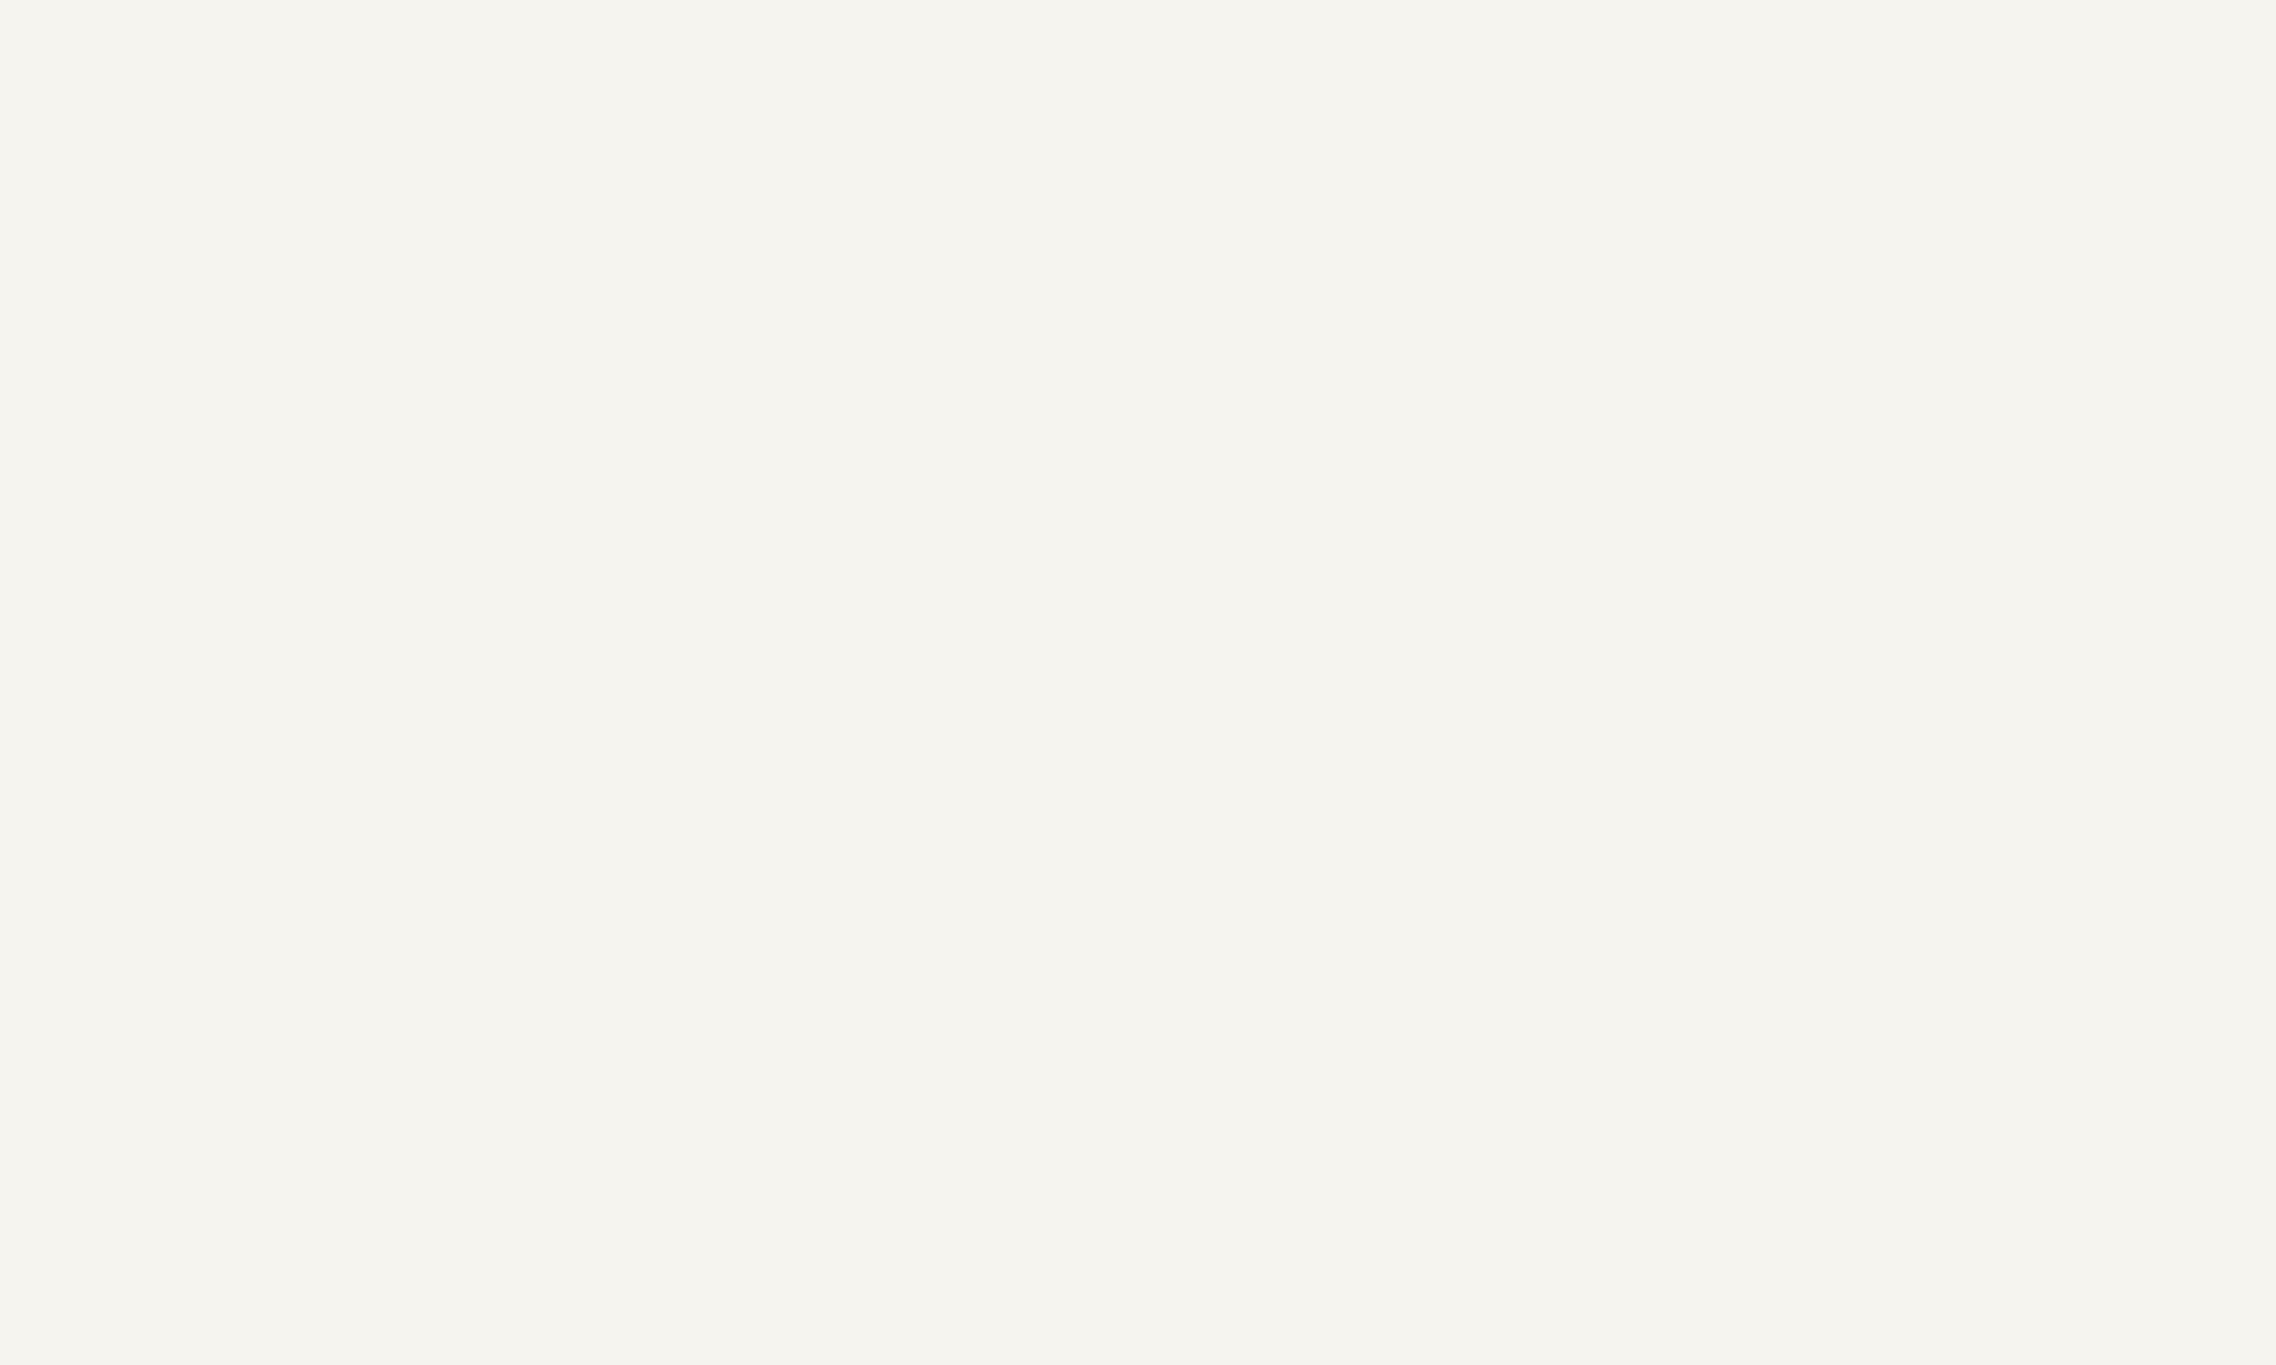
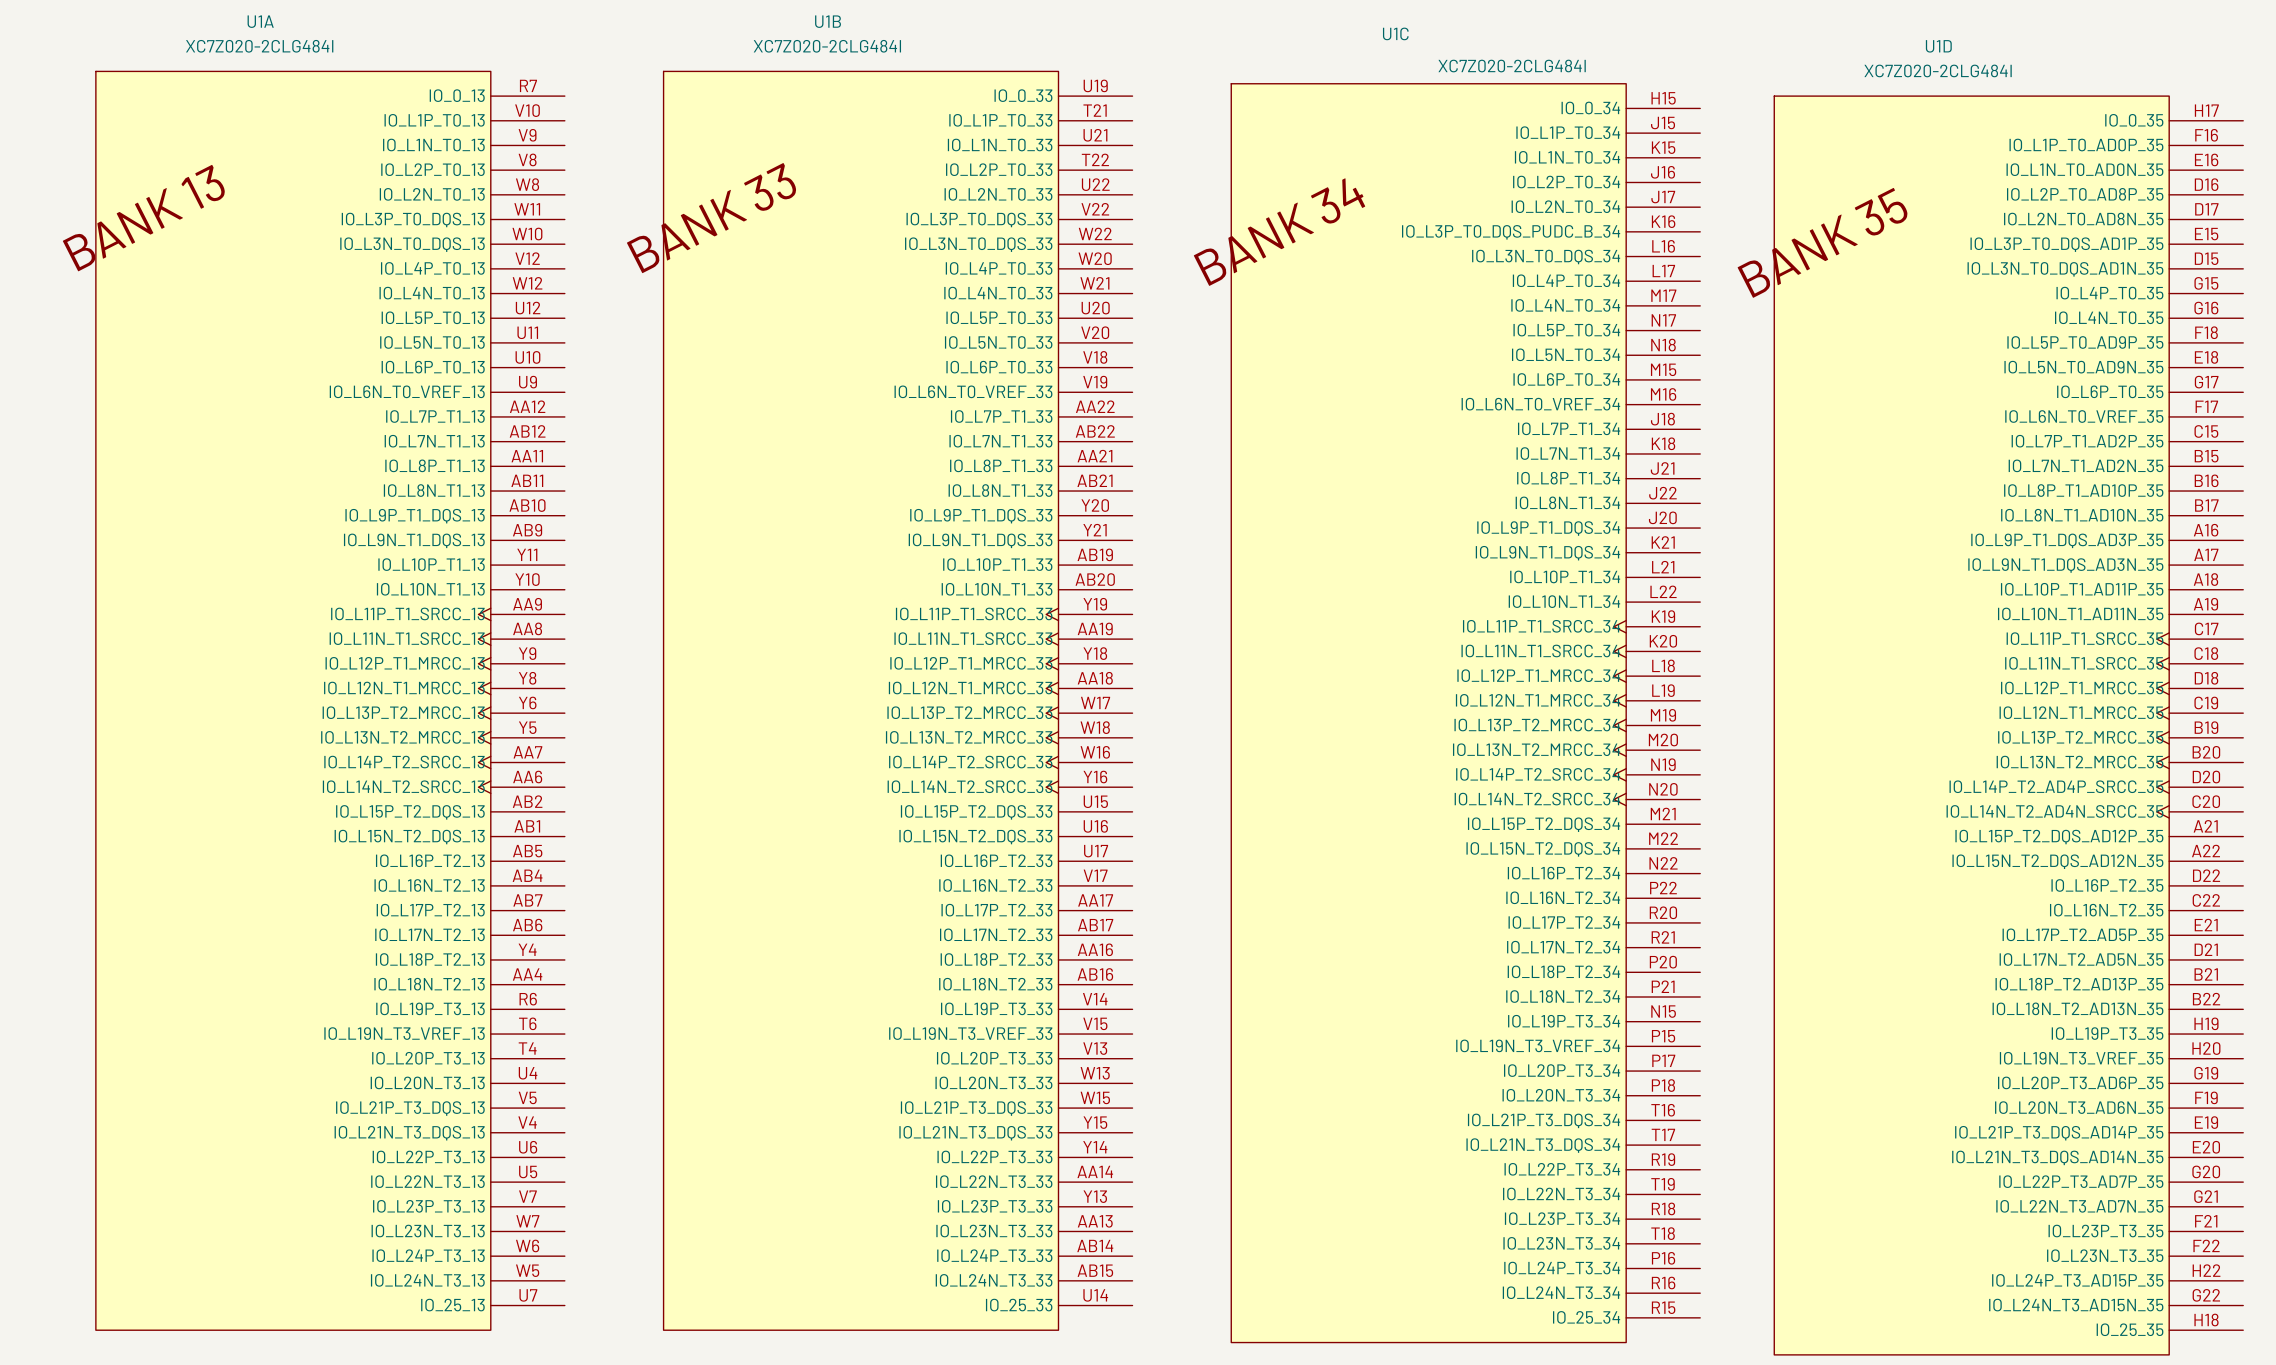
U1A: none -> XC7Z020-2CLG484I (330, 700)
U1B: none -> XC7Z020-2CLG484I (898, 700)
U1C: none -> XC7Z020-2CLG484I (1465, 713)
U1D: none -> XC7Z020-2CLG484I (2008, 725)

